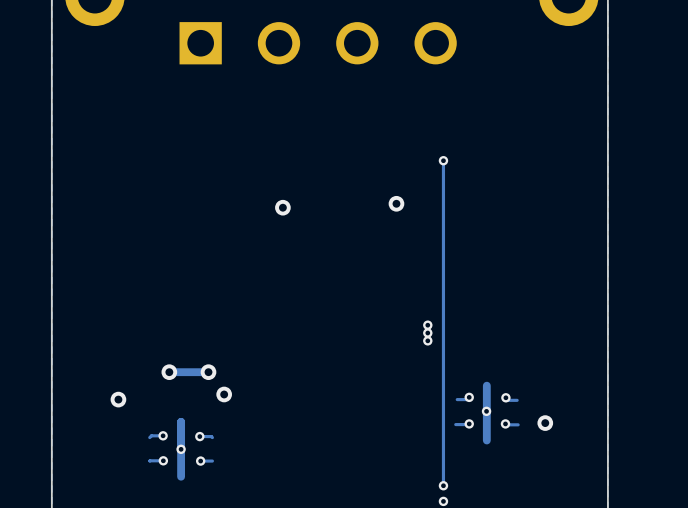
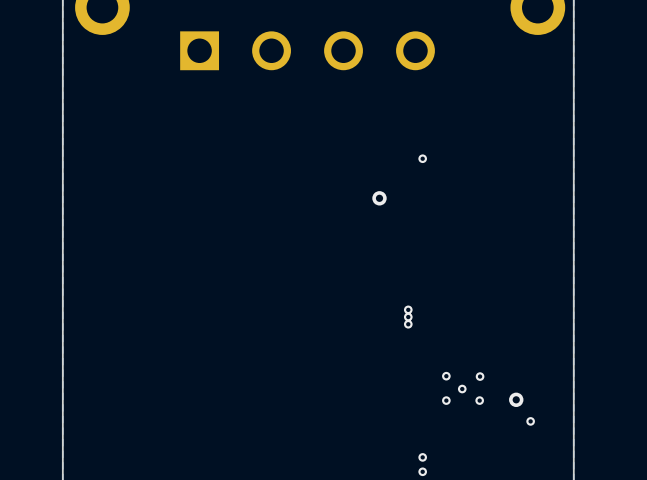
track: (443, 160) (443, 485) -> none
via: (282, 207) -> none
via: (169, 372) -> none
track: (208, 372) (169, 372) -> none
via: (208, 372) -> none
track: (486, 385) (486, 440) -> none
via: (224, 394) -> none
via: (118, 399) -> none
track: (468, 399) (457, 399) -> none
track: (517, 400) (505, 400) -> none
track: (181, 421) (181, 476) -> none
track: (469, 424) (455, 424) -> none
track: (518, 424) (506, 424) -> none
track: (163, 435) (151, 435) (149, 437) -> none
via: (163, 435) -> none
track: (199, 436) (212, 437) -> none
via: (199, 436) -> none
via: none -> (530, 421)
via: (181, 449) -> none
via: (163, 460) -> none
track: (163, 461) (149, 461) -> none
via: (200, 461) -> none
track: (212, 461) (200, 461) -> none

